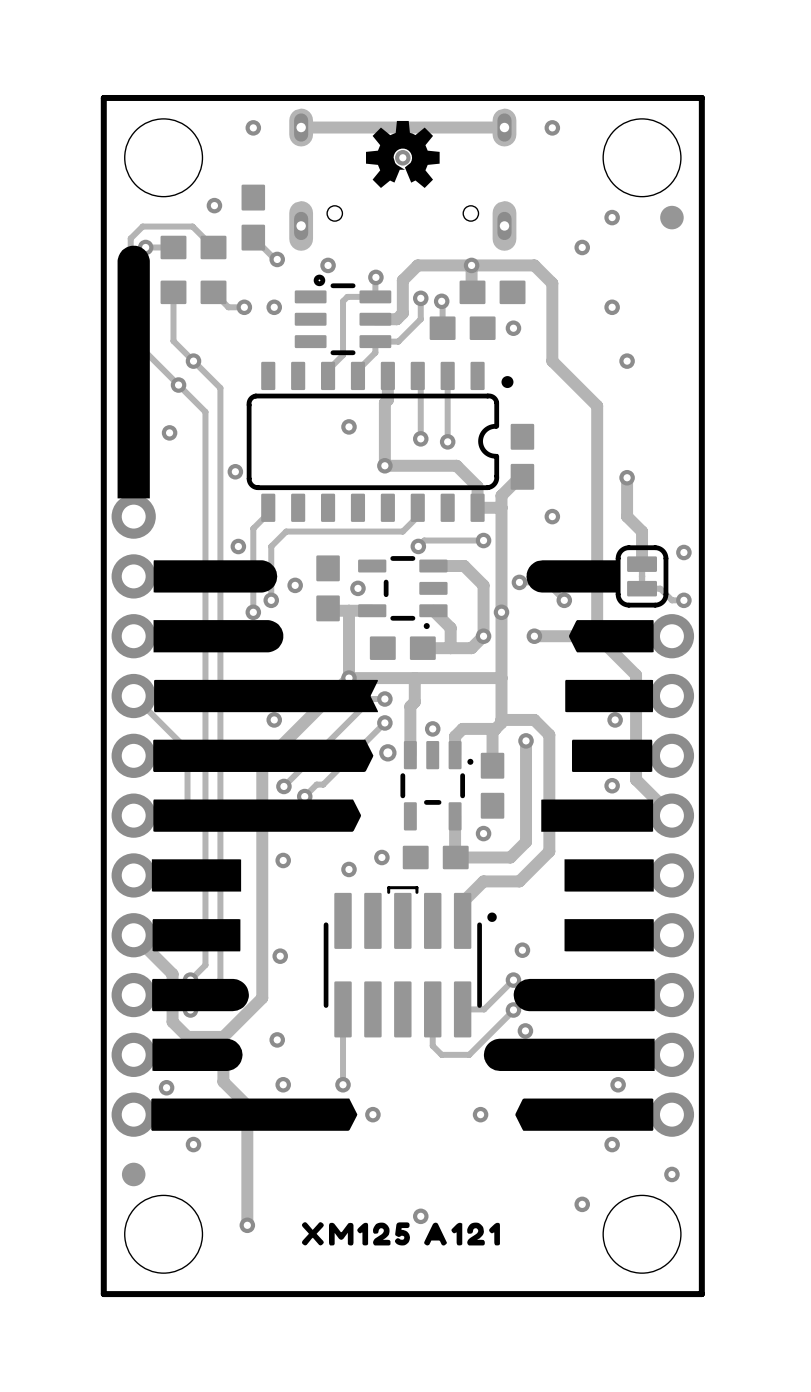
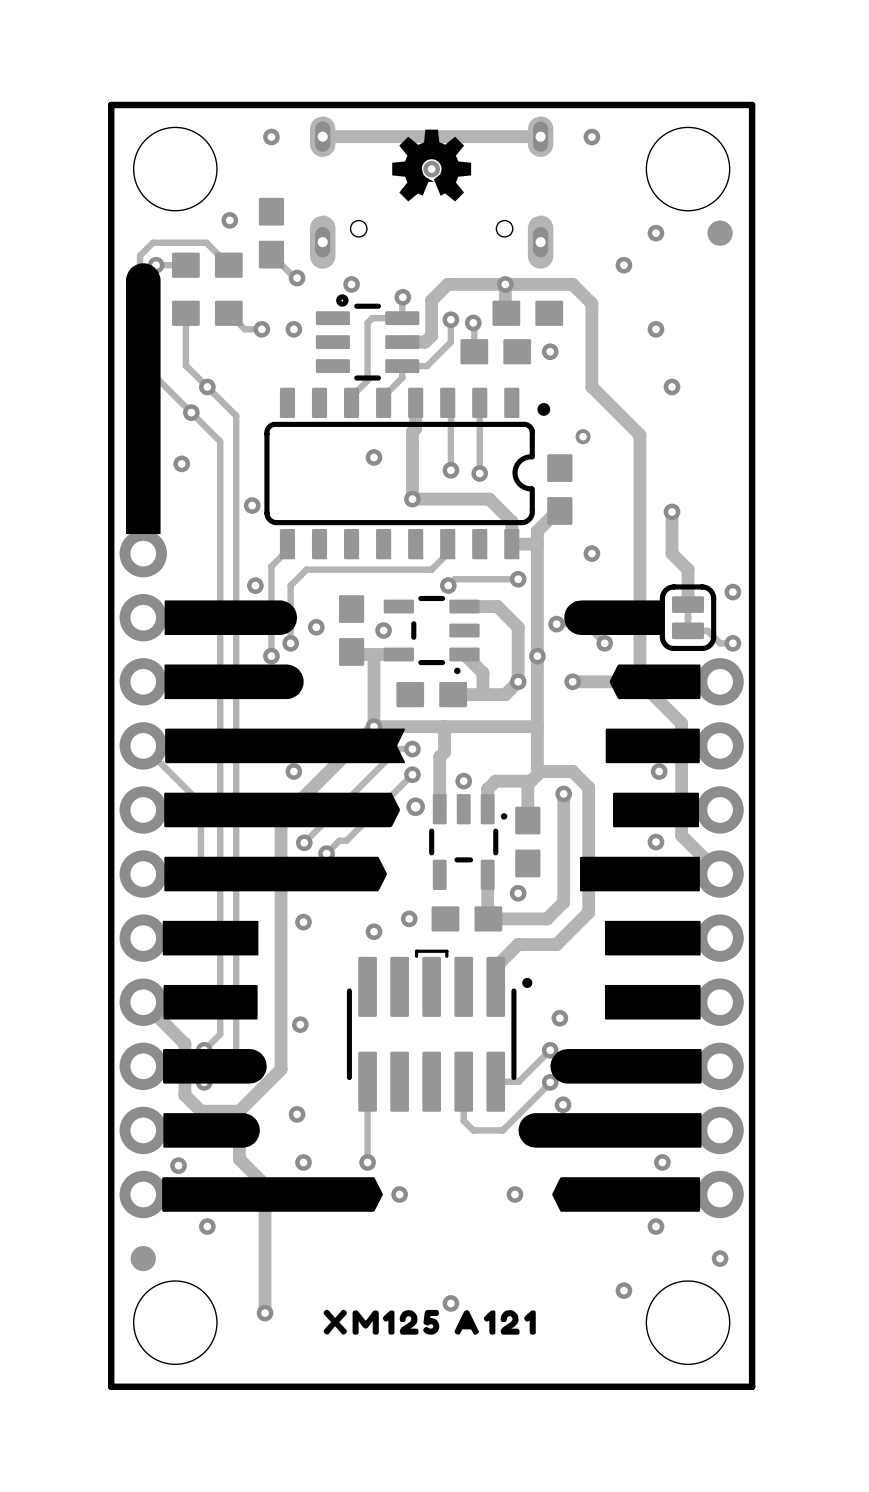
via: none -> (583, 436)

